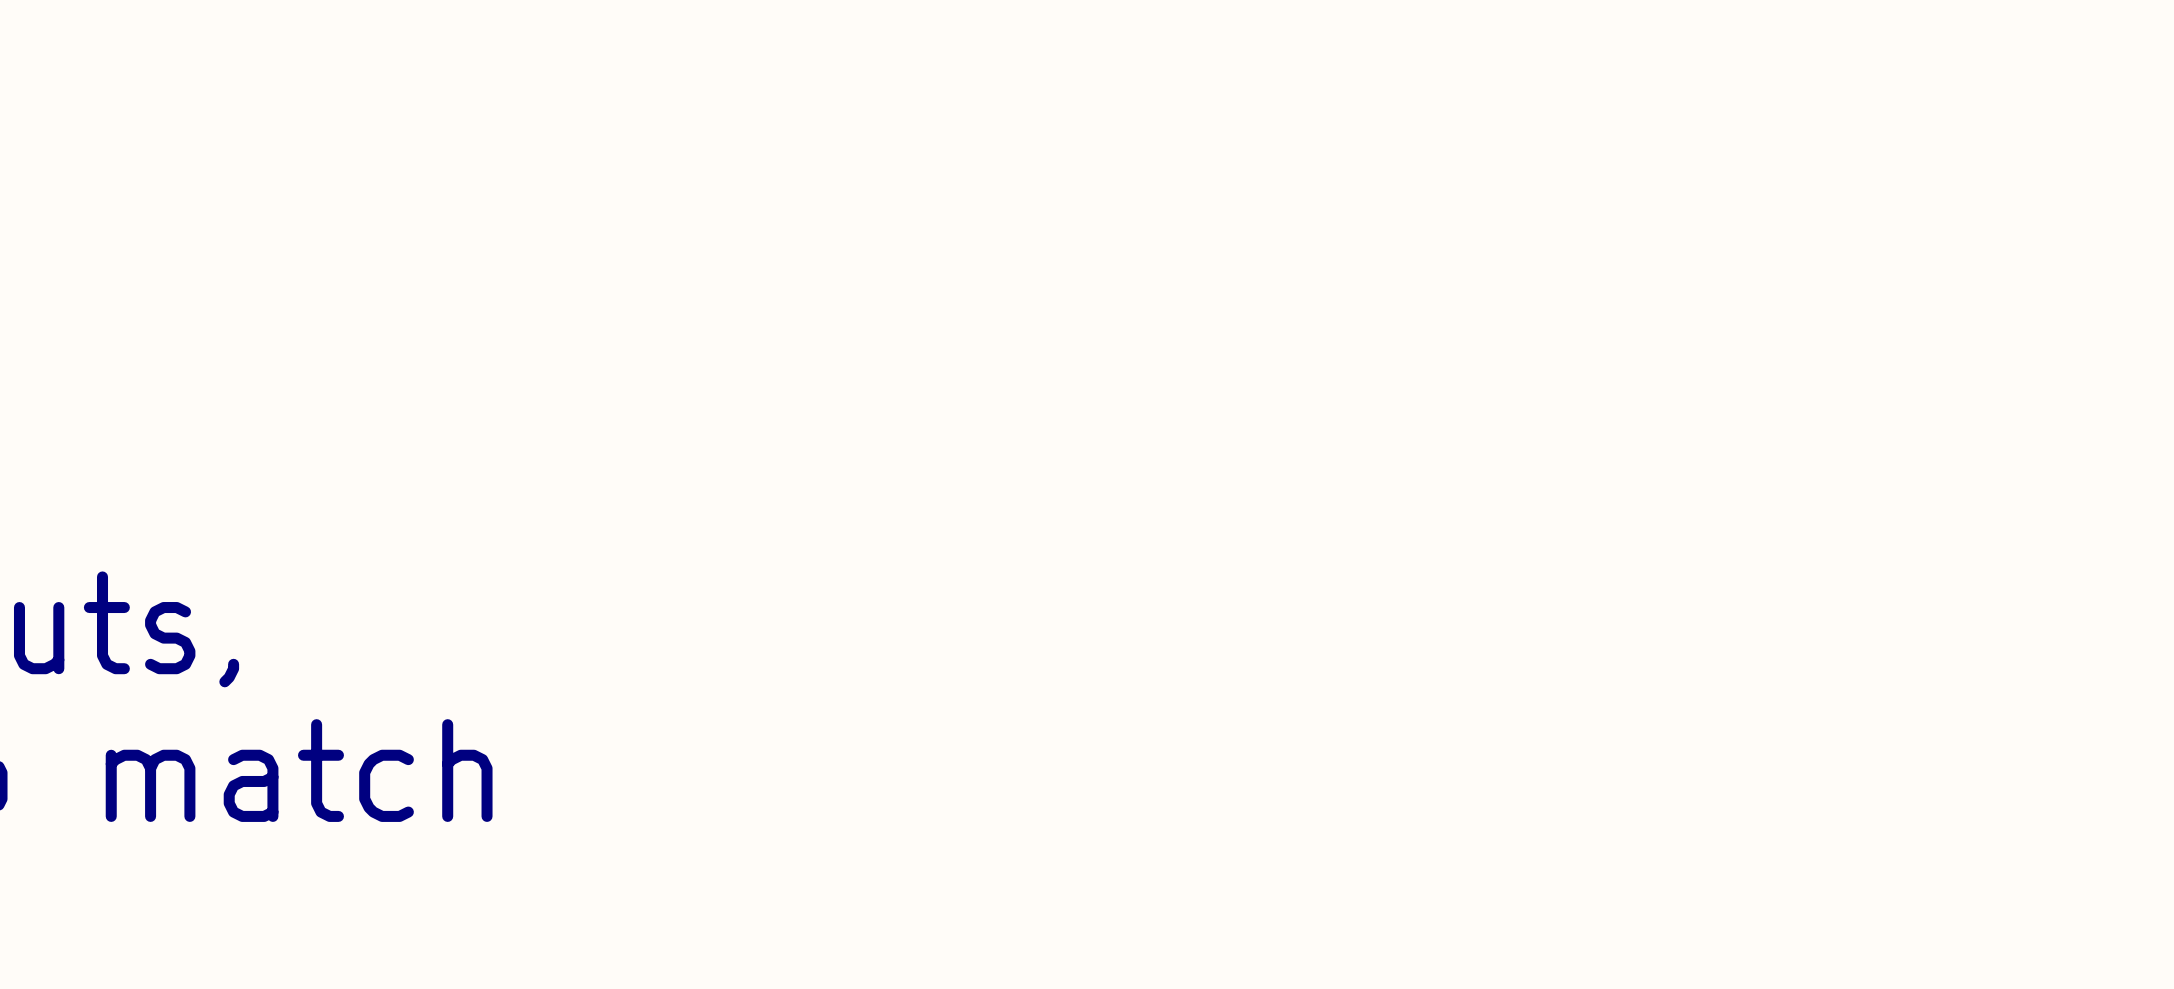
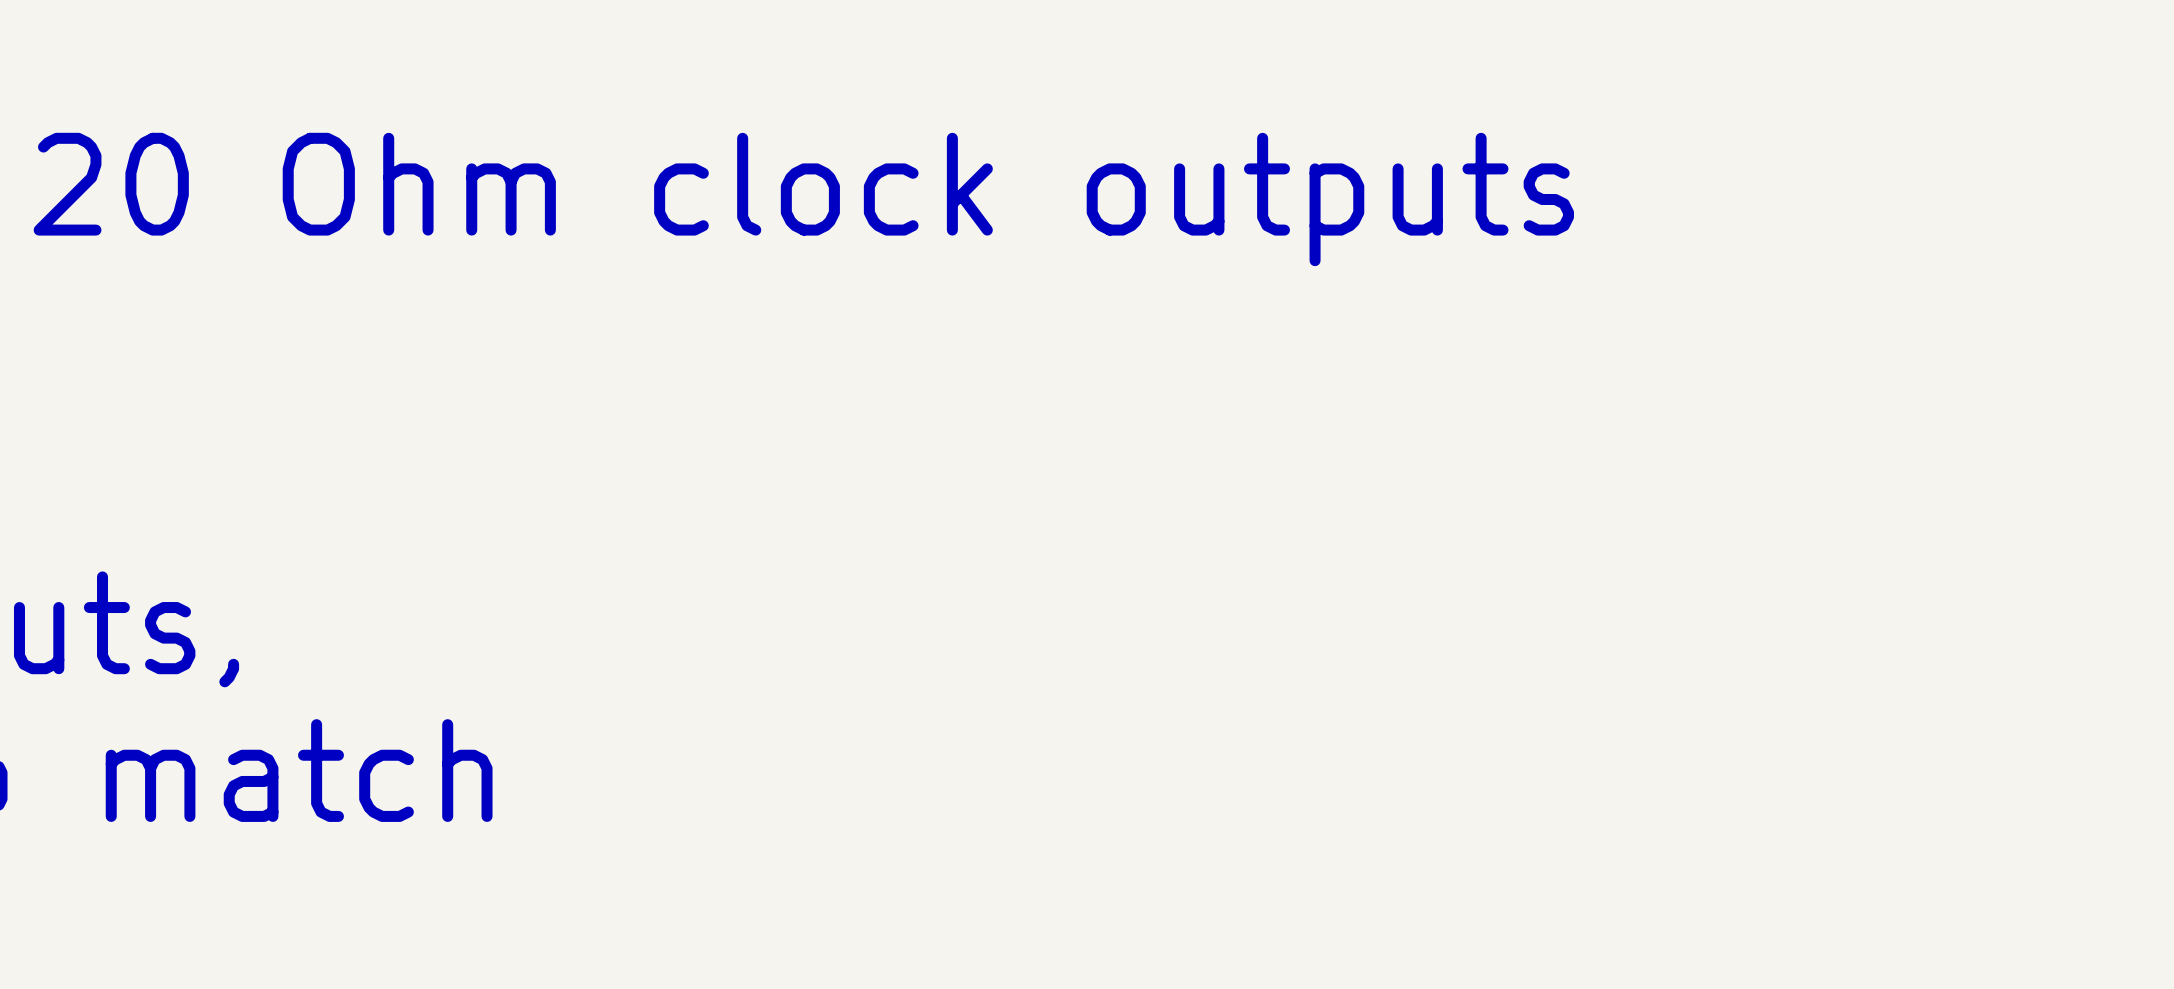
text: none -> 20 Ohm clock outputs (803, 199)

